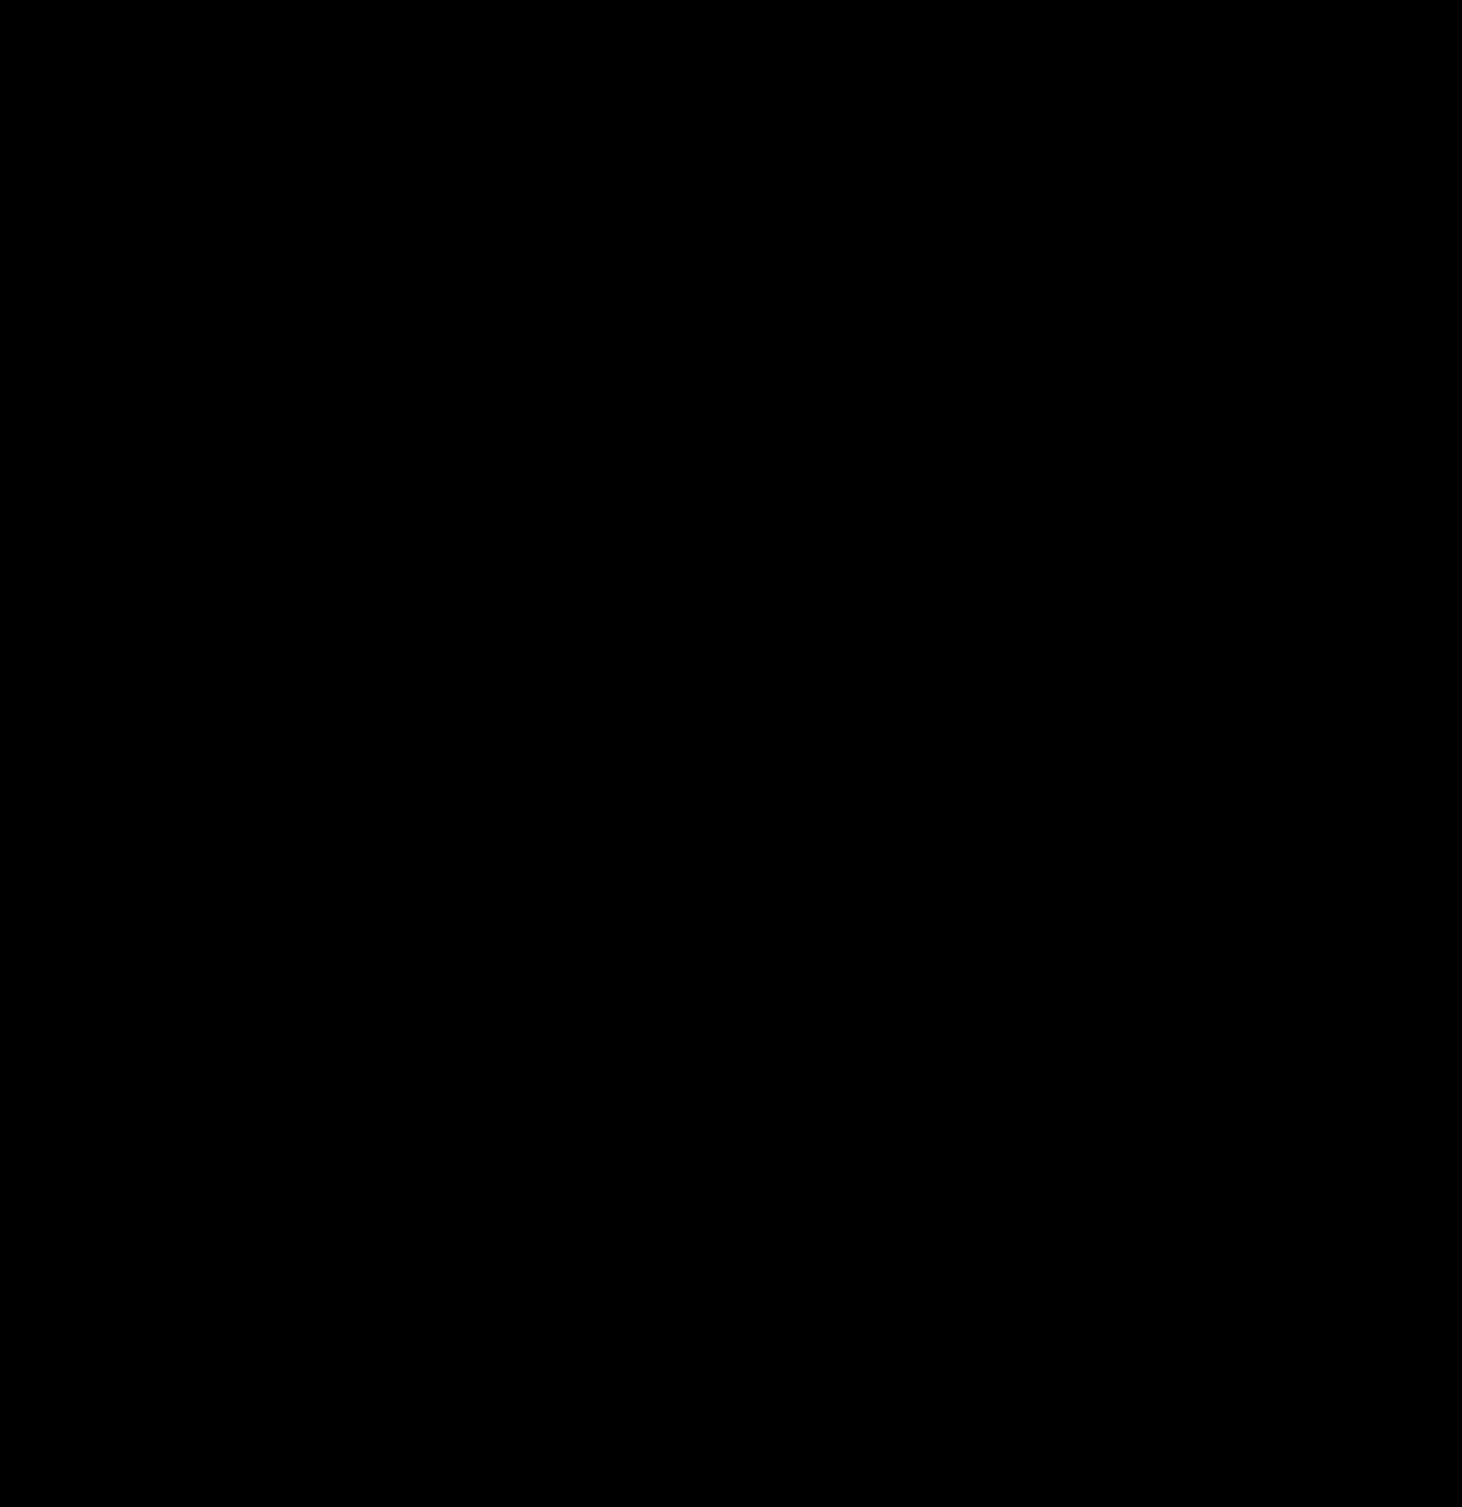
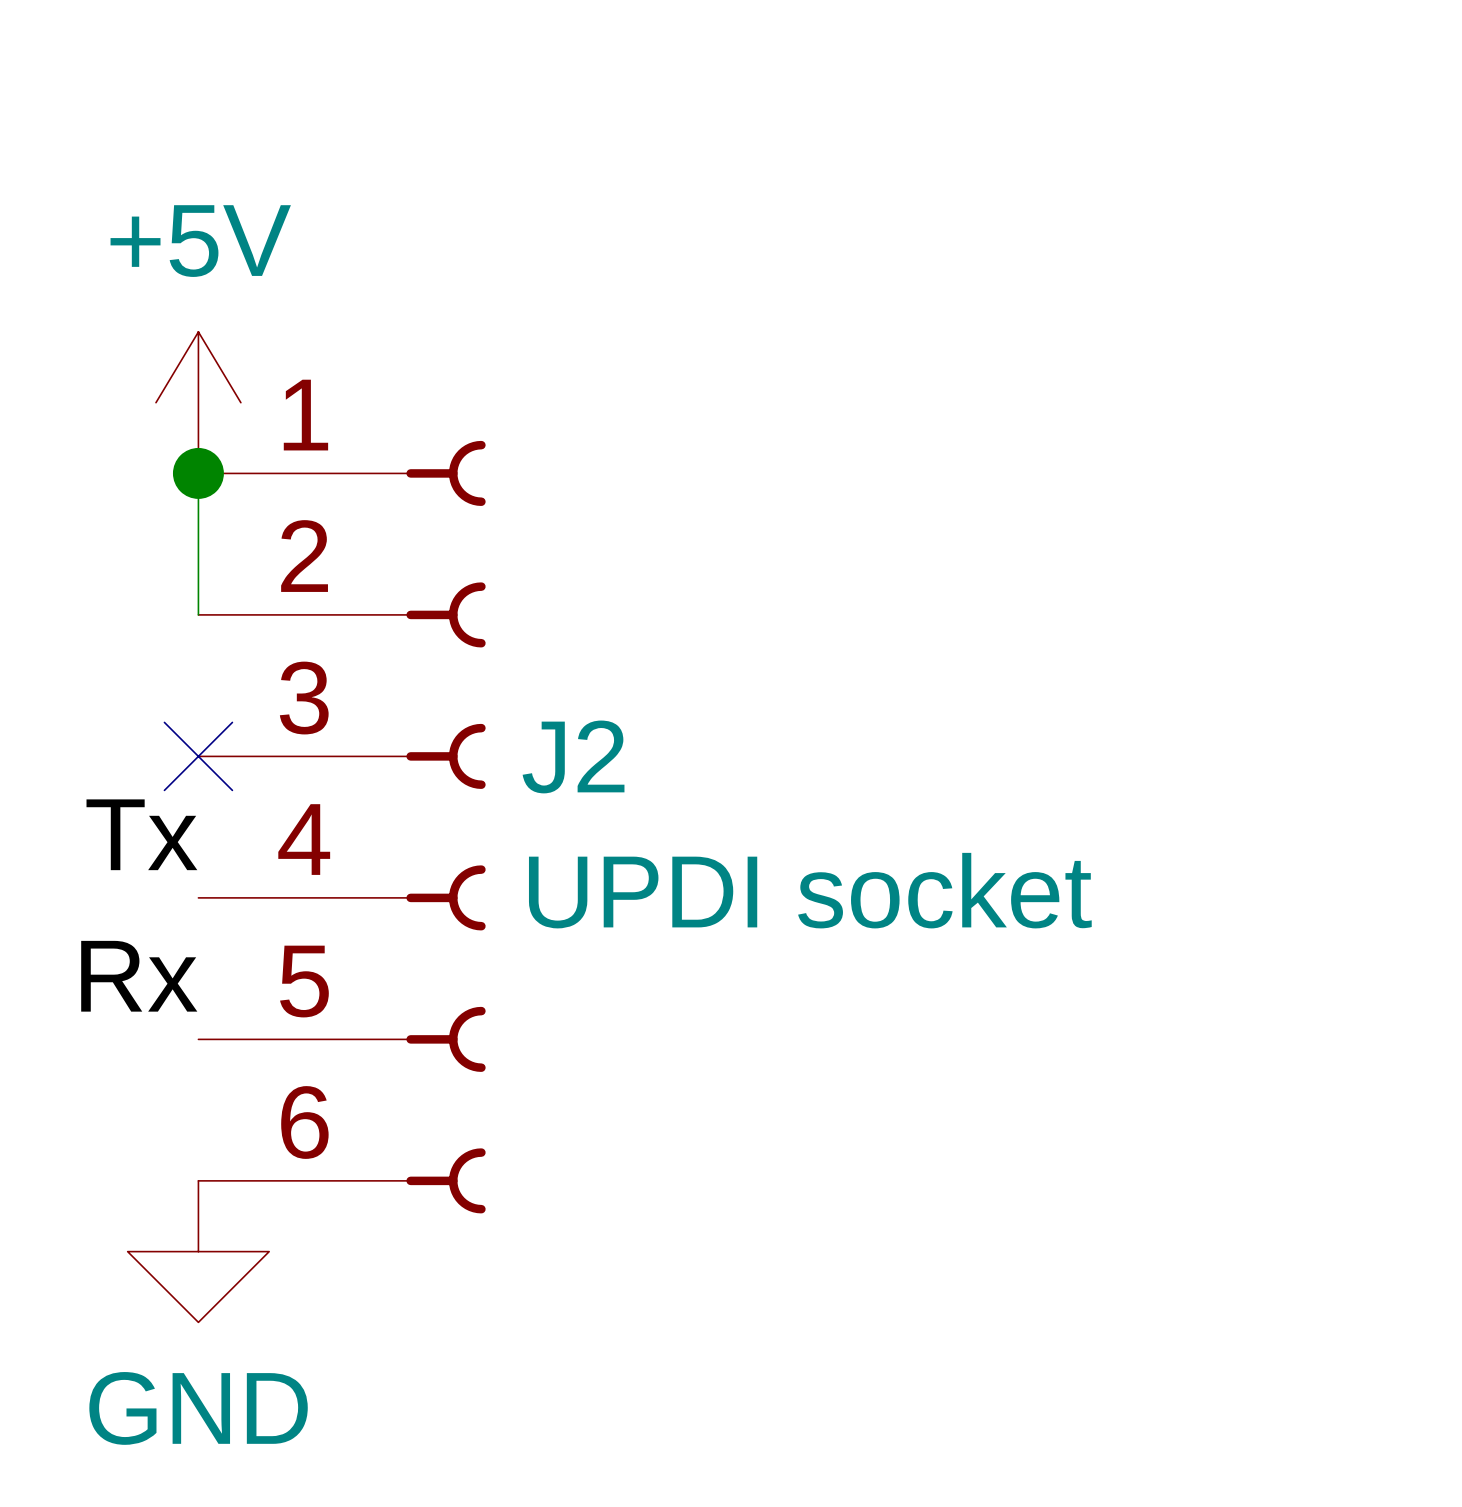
power symbol: none -> +5V (198, 402)
wire: none -> (198, 473) (198, 614)
junction: none -> (198, 473)
no-connect mark: none -> (198, 756)
J2: none -> UPDI socket (342, 827)
label: none -> Tx (141, 834)
label: none -> Rx (139, 976)
power symbol: none -> GND (198, 1251)

